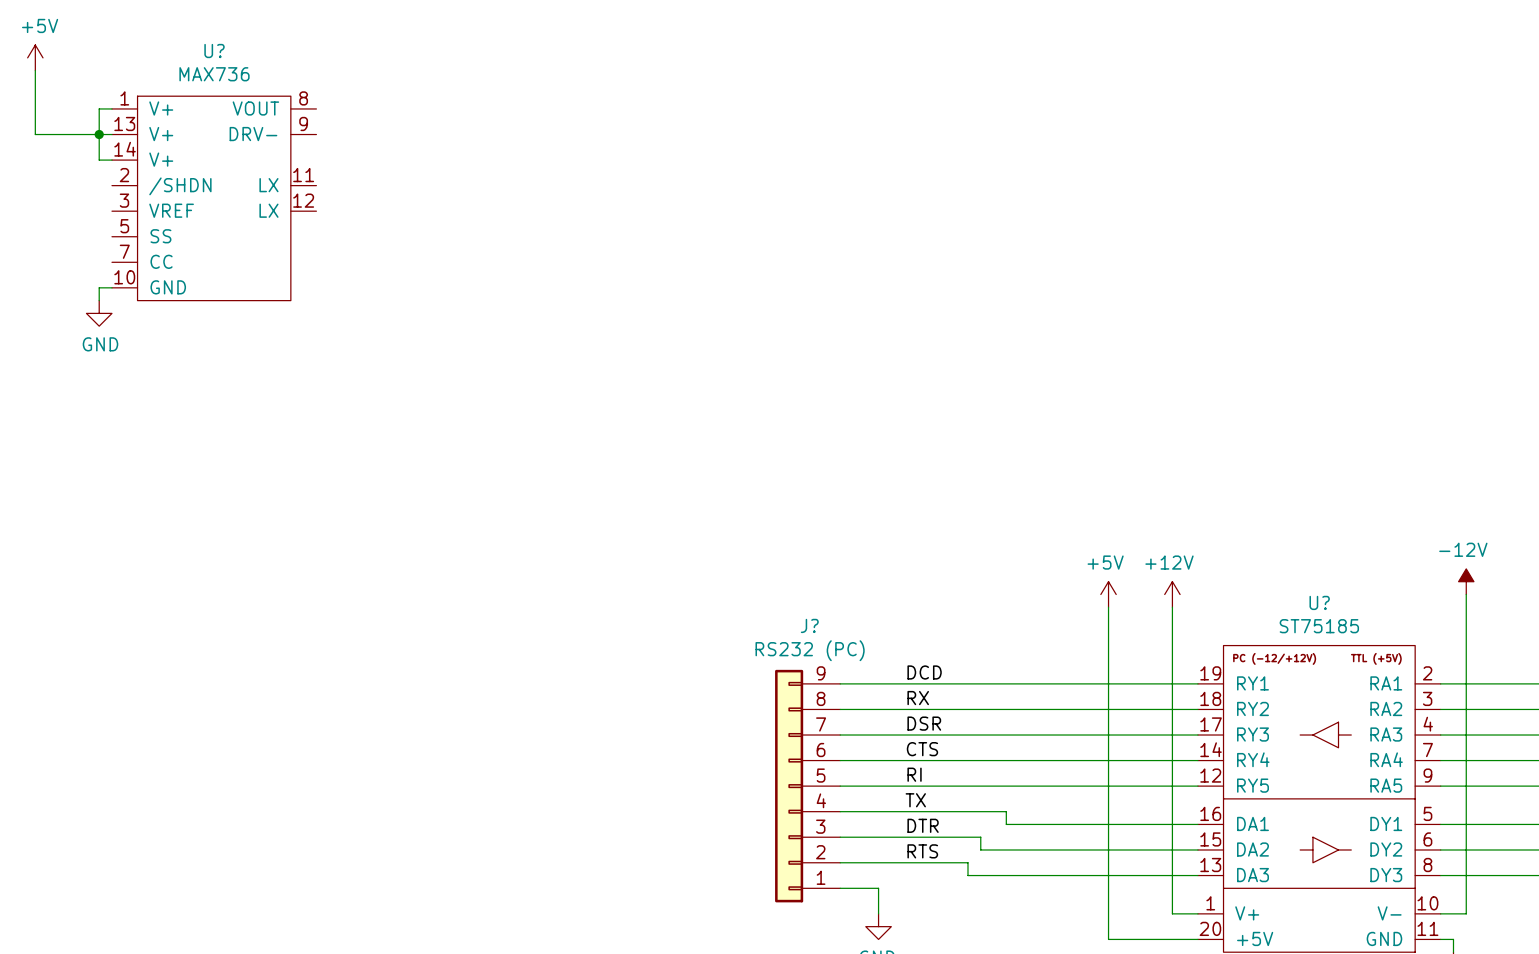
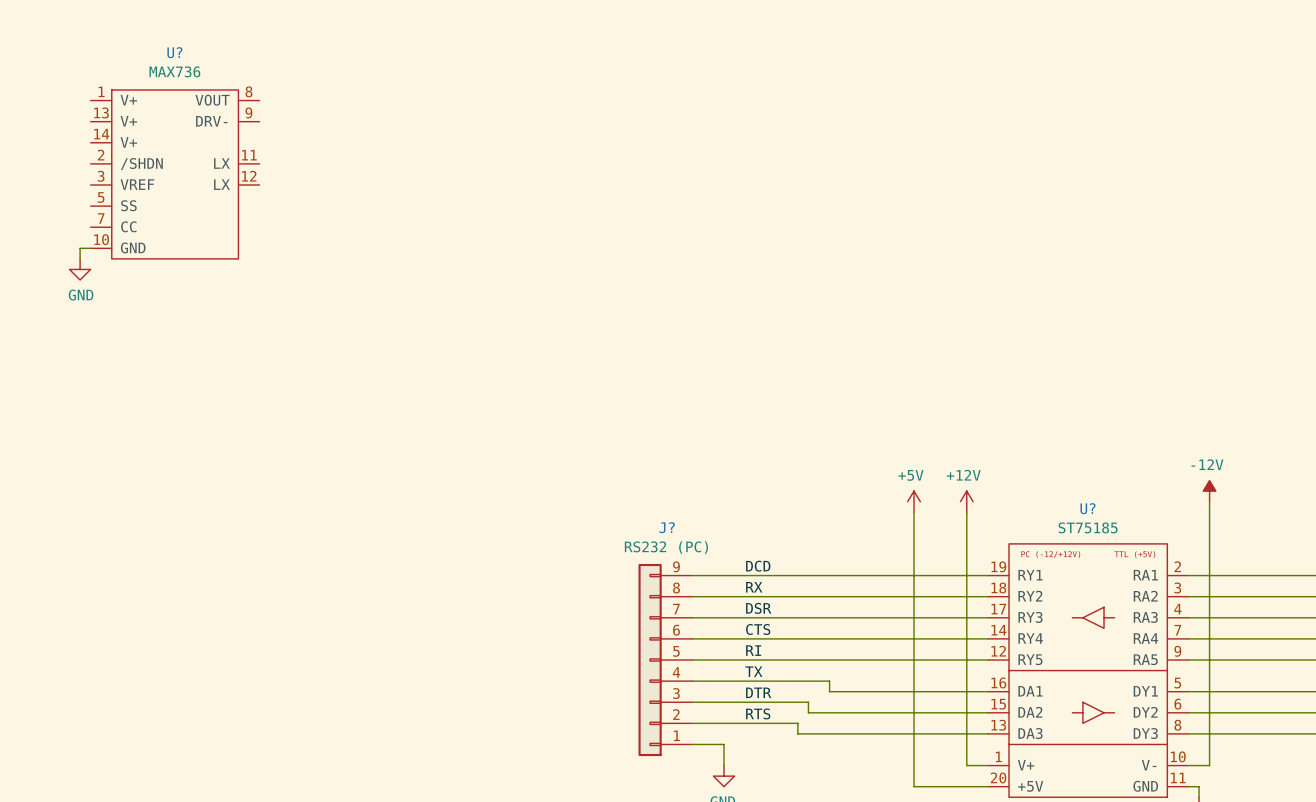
power symbol: +5V (35, 57) -> none
wire: (35, 70) (35, 134) (111, 134) -> none
wire: (111, 108) (99, 108) (99, 160) (111, 160) -> none
junction: (99, 134) -> none

